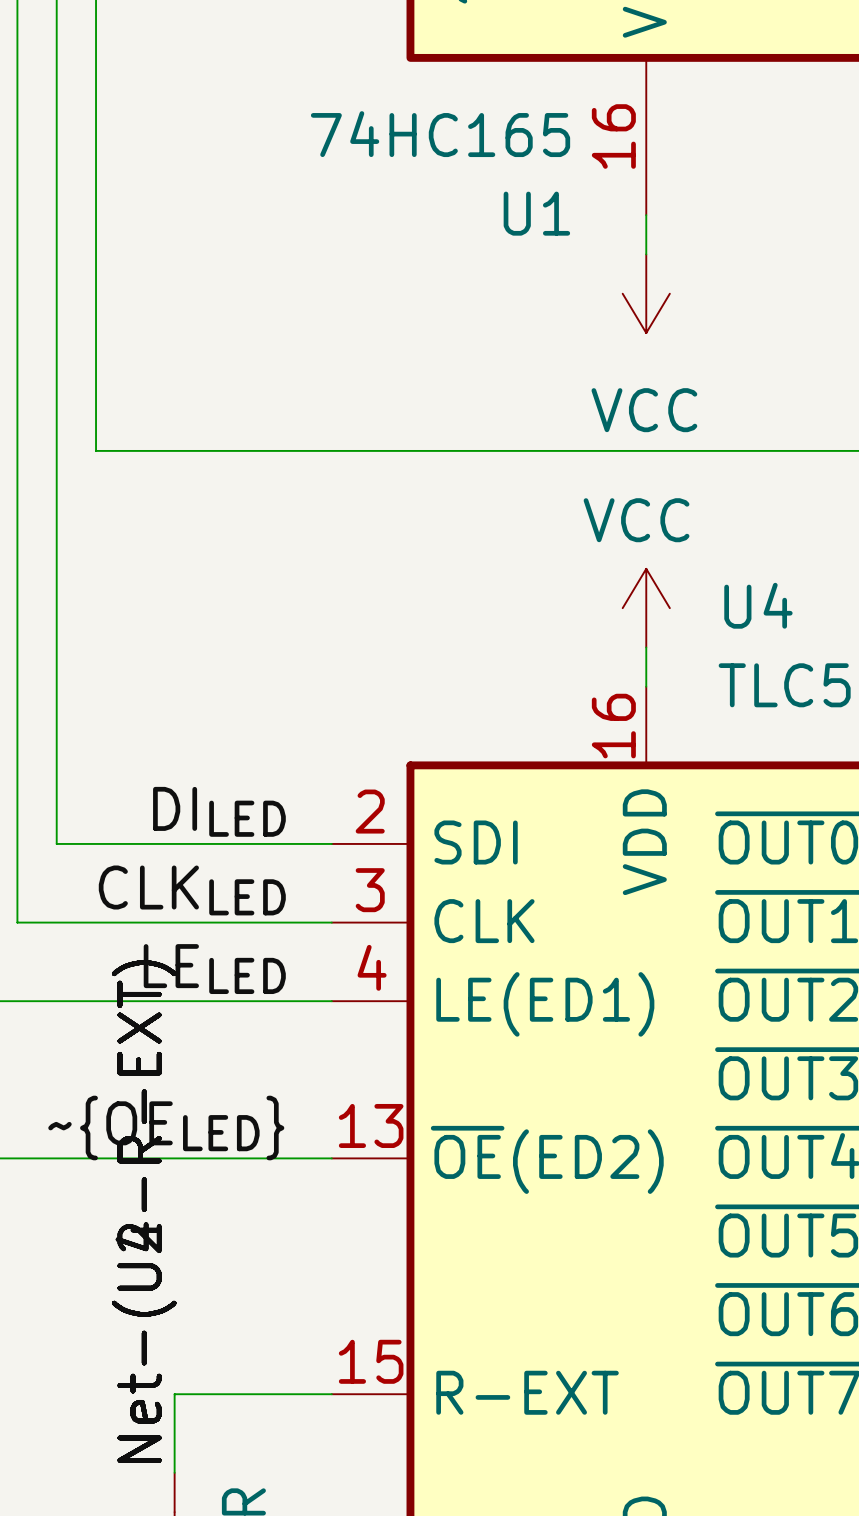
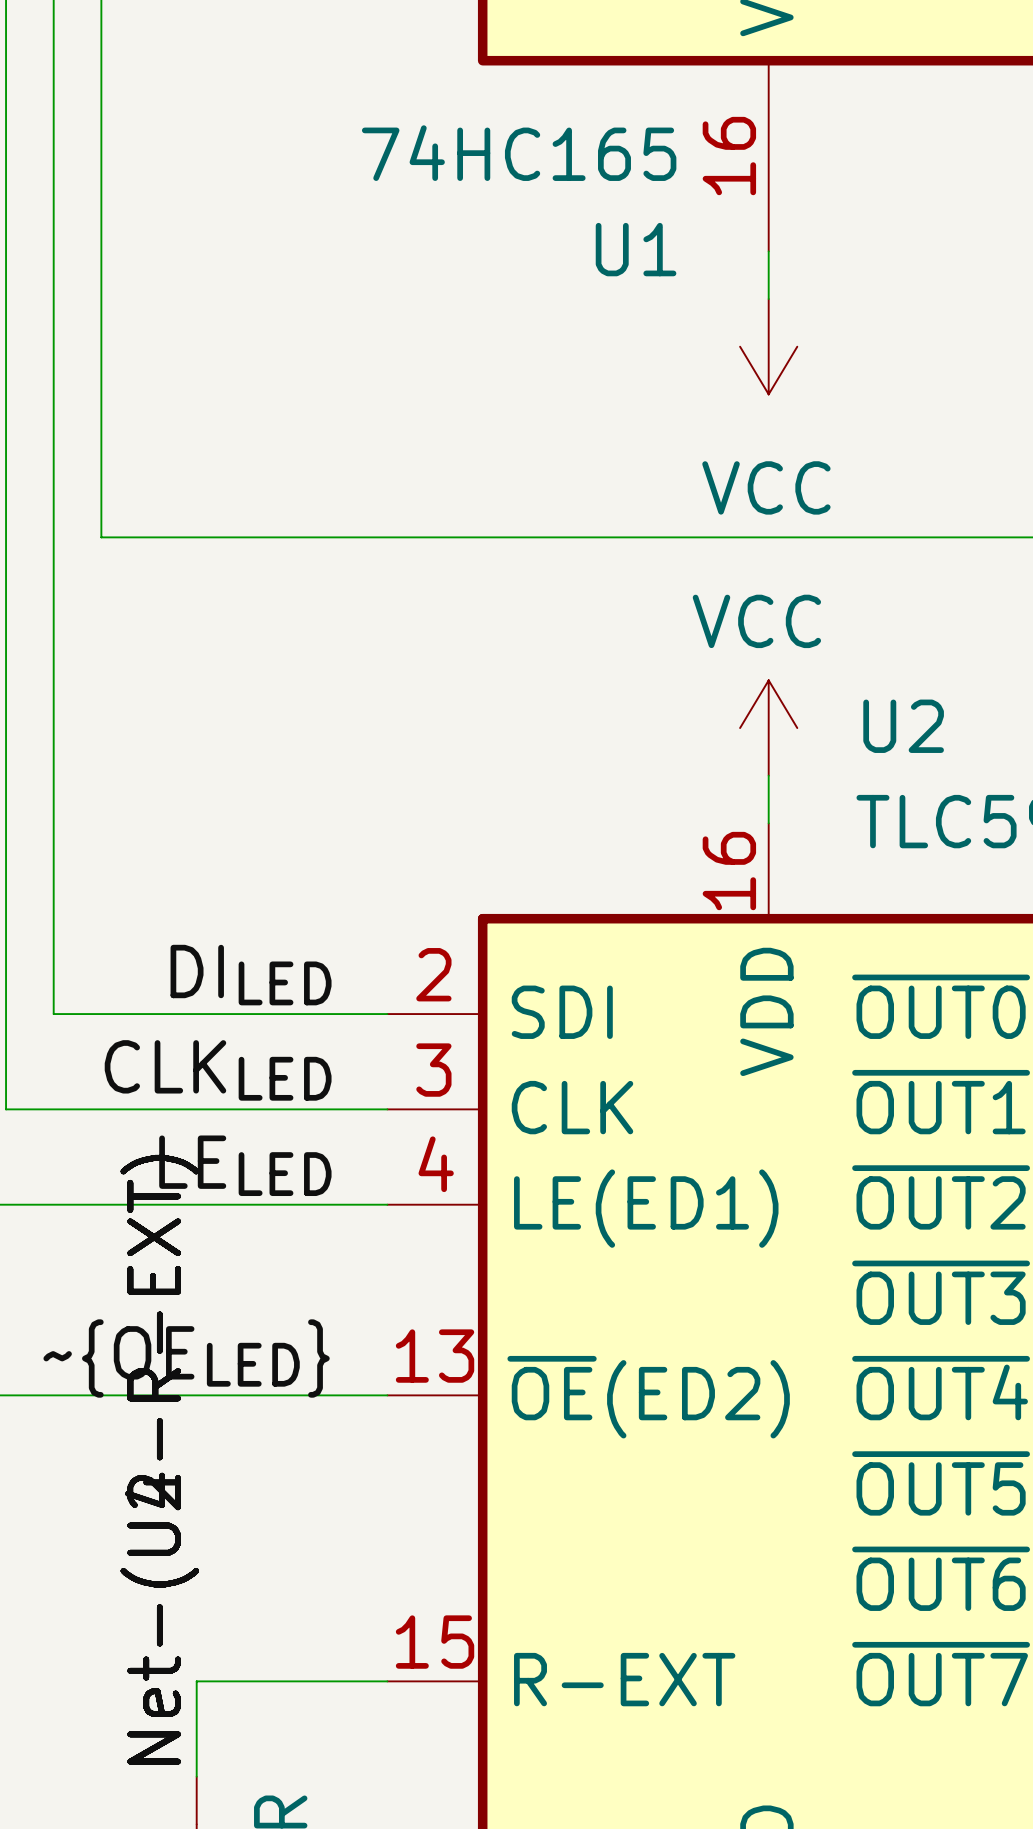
U4 name: U4 (758, 605) -> U2 (903, 726)

